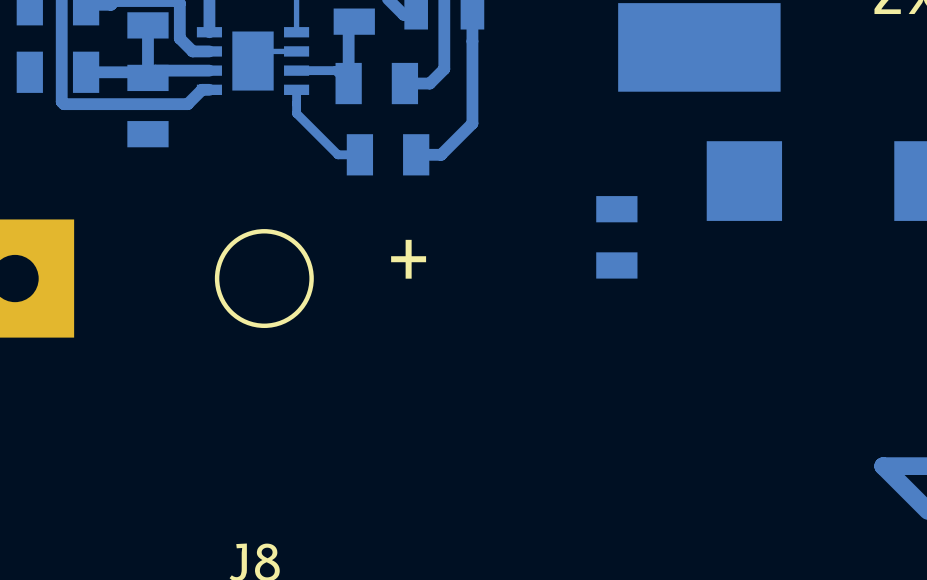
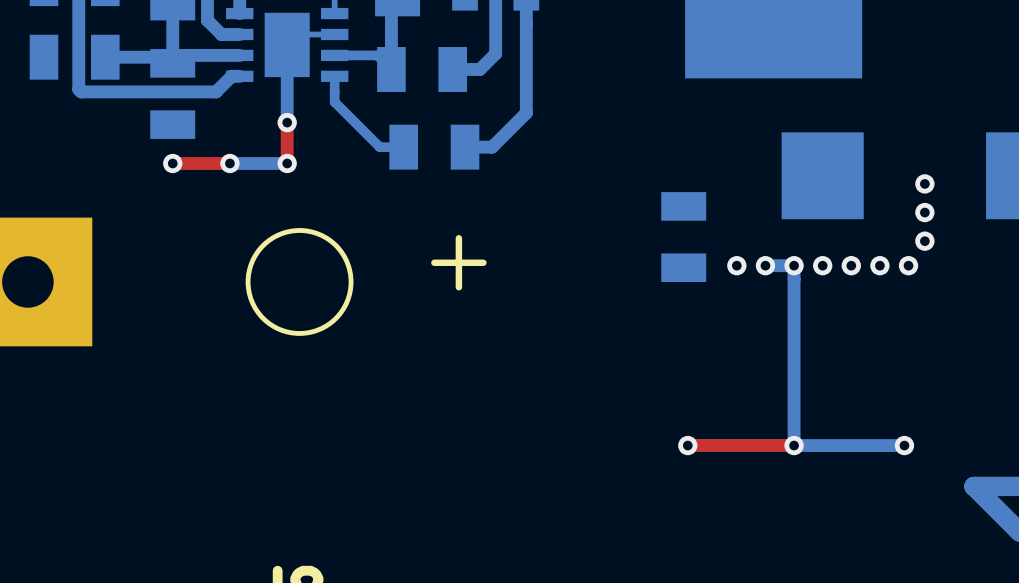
bottom track: none -> (287, 44) (287, 122)
top track: none -> (287, 122) (287, 163)
via: none -> (287, 122)
top track: none -> (172, 163) (229, 163)
via: none -> (172, 163)
bottom track: none -> (229, 163) (287, 163)
via: none -> (229, 163)
via: none -> (287, 163)
via: none -> (924, 183)
via: none -> (924, 212)
via: none -> (924, 241)
via: none -> (736, 265)
bottom track: none -> (765, 265) (794, 265) (794, 445)
via: none -> (765, 265)
via: none -> (794, 265)
via: none -> (822, 265)
via: none -> (851, 265)
via: none -> (879, 265)
via: none -> (908, 265)
bottom track: none -> (687, 445) (904, 445)
top track: none -> (687, 445) (794, 445)
via: none -> (687, 445)
via: none -> (794, 445)
via: none -> (904, 445)

